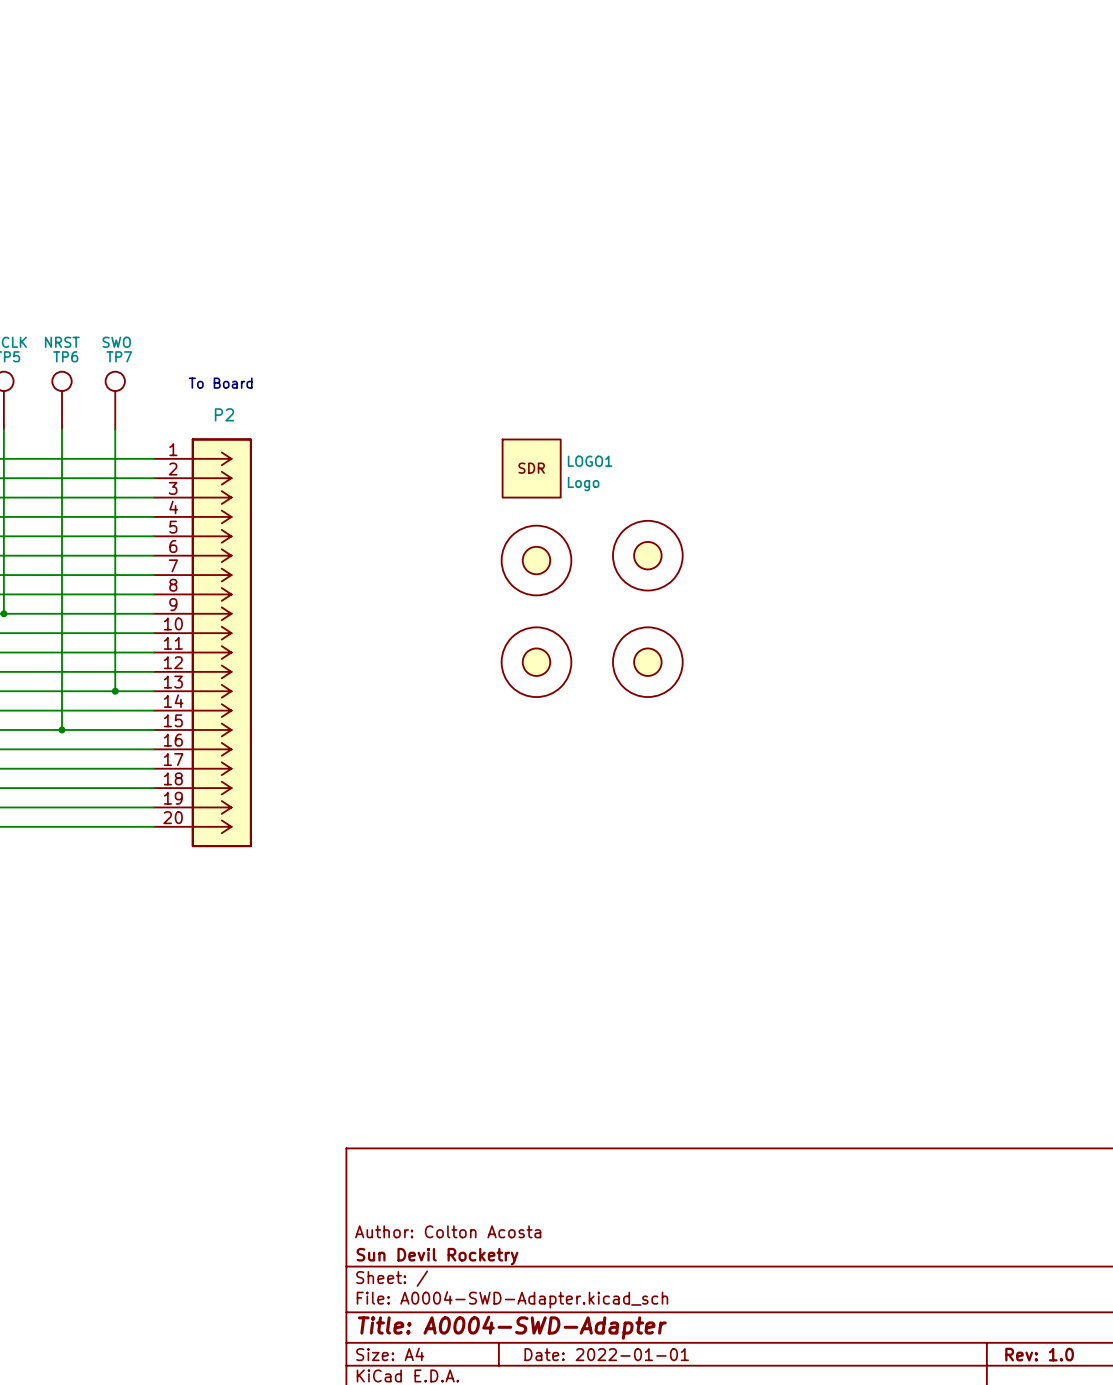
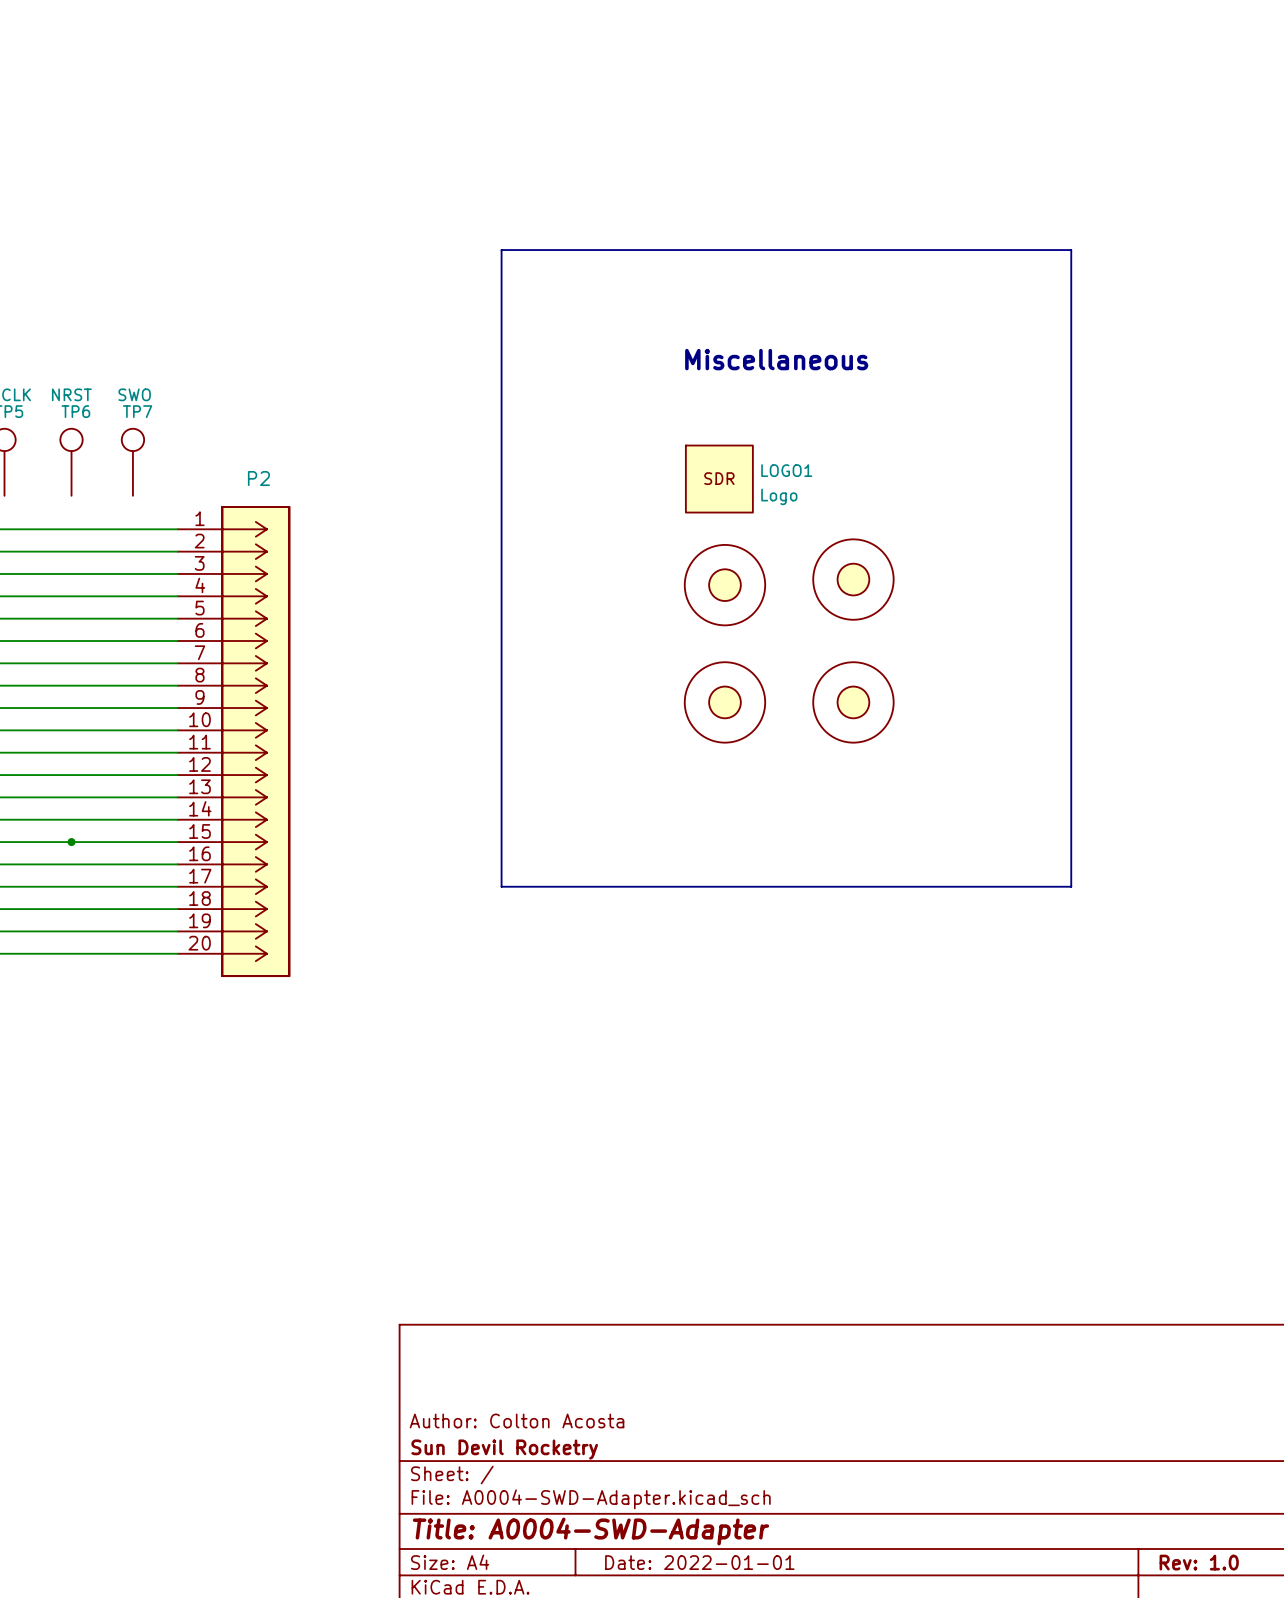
line: none -> (501, 250) (1071, 250) (1071, 886) (501, 886) (501, 250)
text: none -> Miscellaneous (776, 359)
text: To Board (220, 383) -> none
wire: (3, 429) (3, 613) -> none
wire: (62, 429) (62, 729) -> none
wire: (115, 429) (115, 691) -> none
LOGO1 position: (531, 468) -> (719, 479)
part: none -> (853, 579)
part: none -> (724, 585)
part: (647, 555) -> none
part: (536, 560) -> none
part: none -> (724, 702)
part: none -> (853, 702)
junction: (3, 613) -> none
part: (536, 662) -> none
part: (647, 662) -> none
junction: (115, 691) -> none

